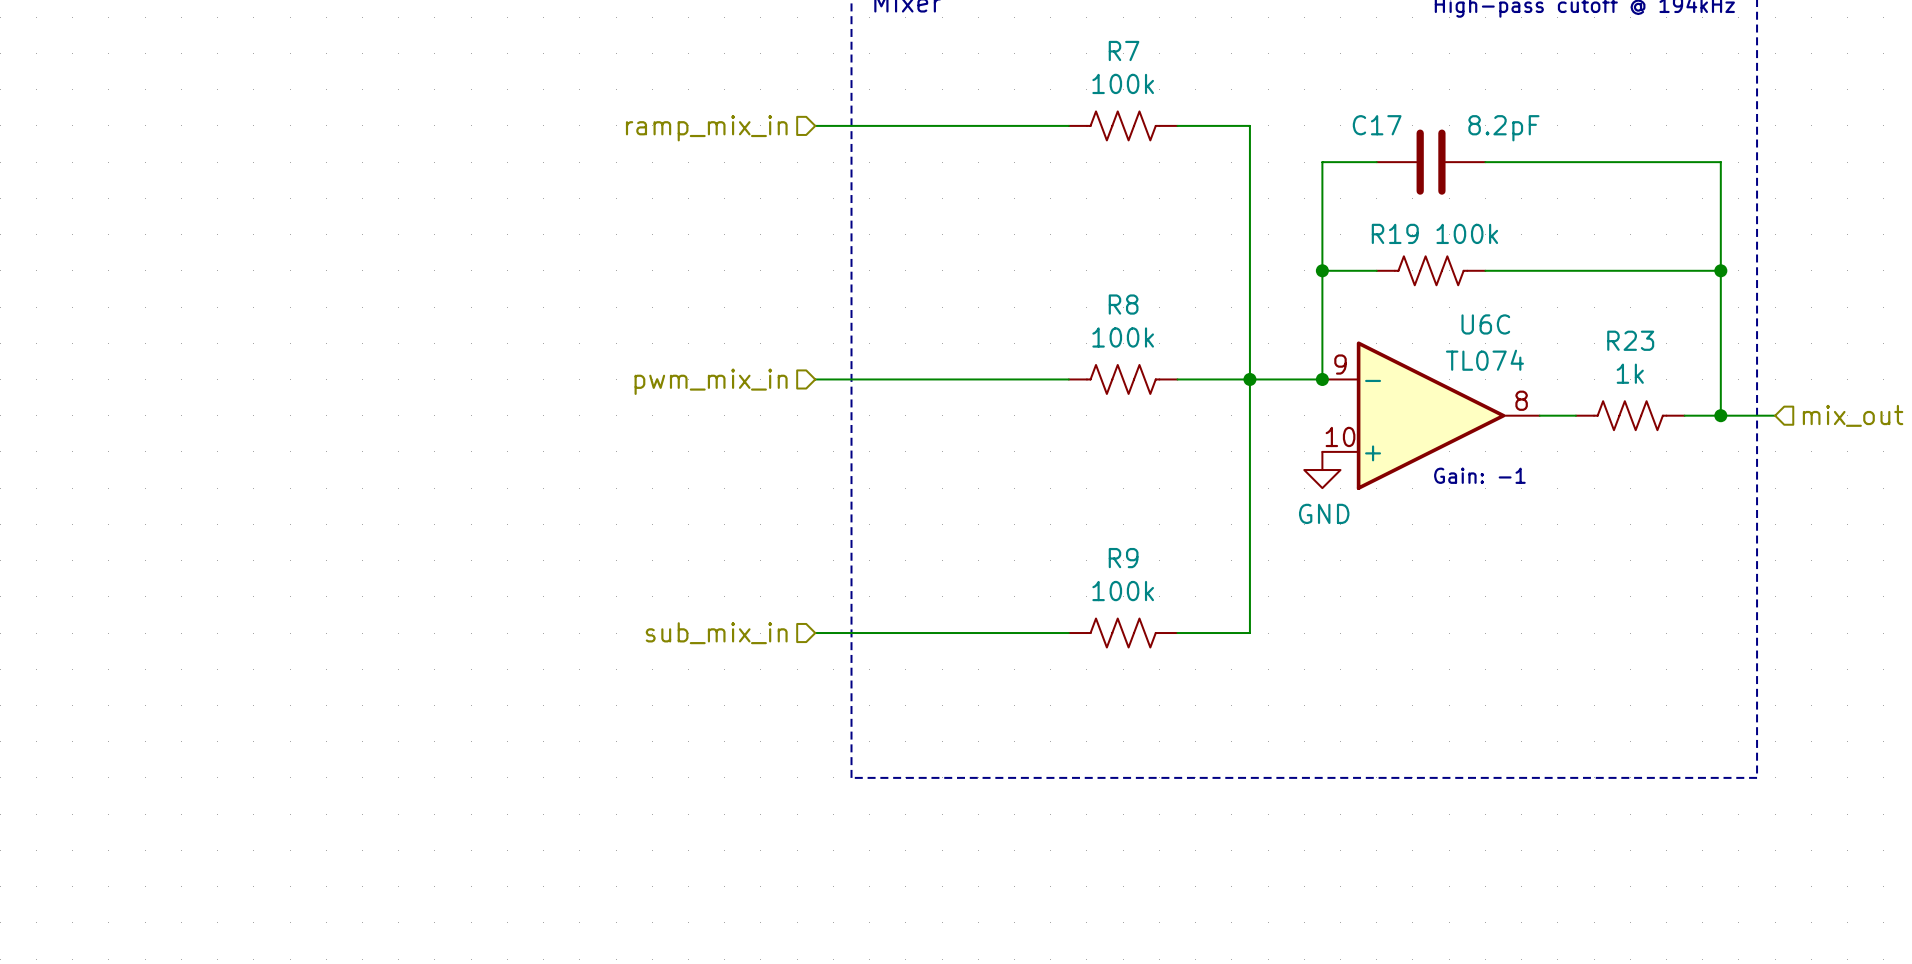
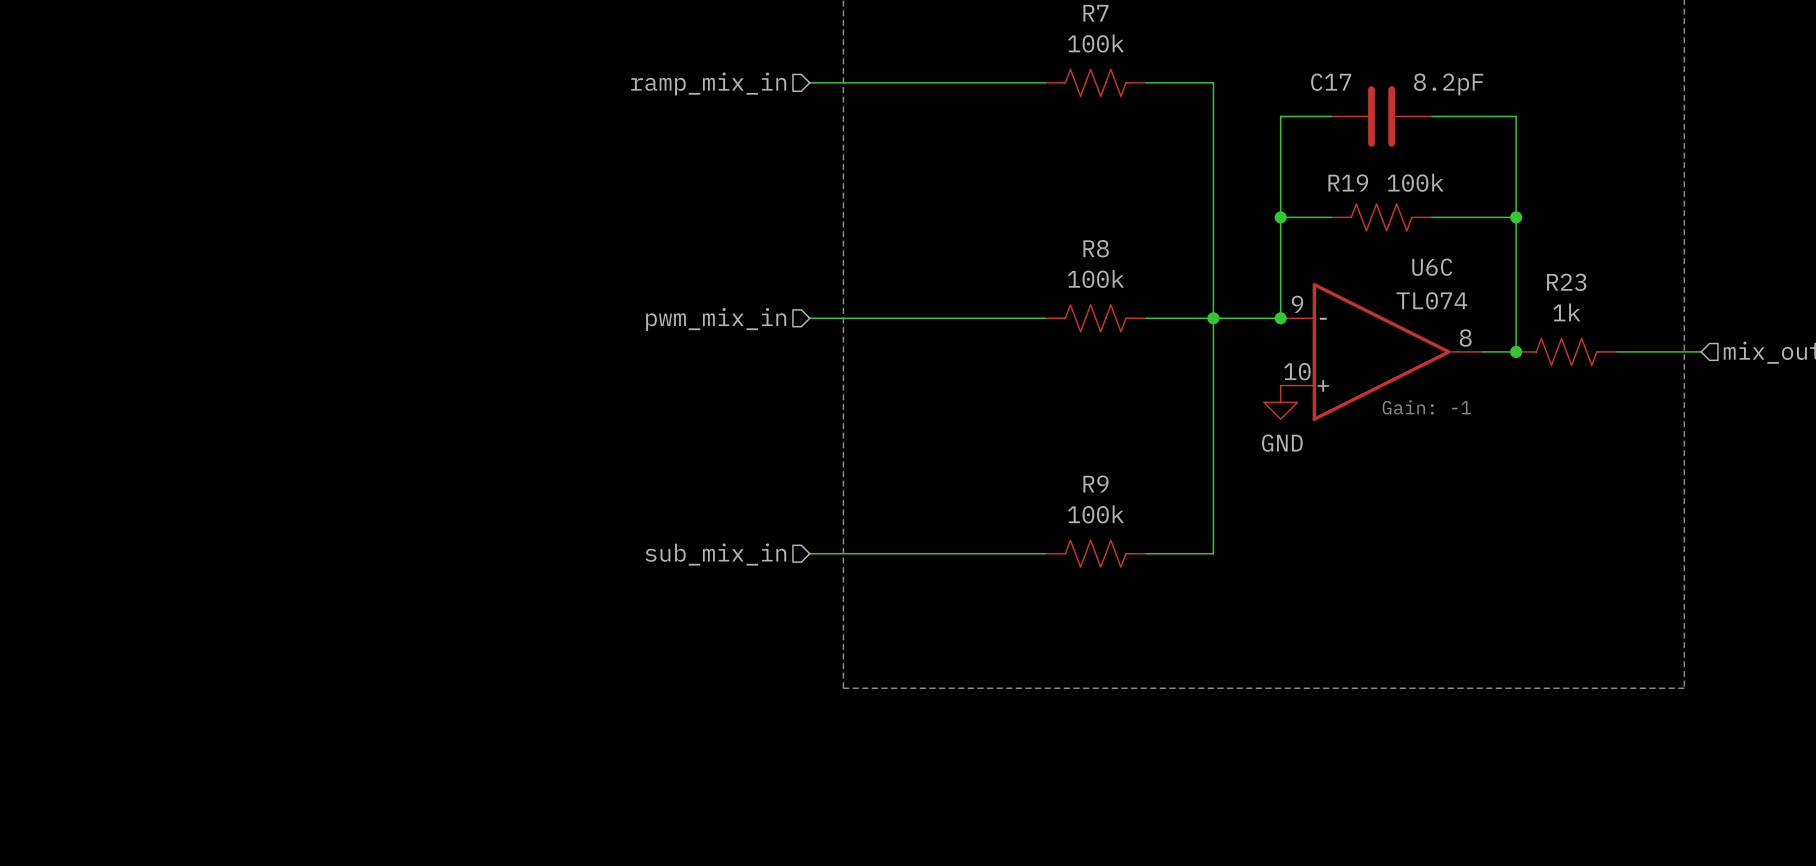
wire: (1575, 162) (1720, 162) (1720, 415) -> (1516, 116) (1516, 351)
wire: (1575, 270) (1720, 270) -> none
junction: none -> (1516, 217)
junction: (1720, 270) -> none
junction: none -> (1516, 351)
junction: (1720, 415) -> none

